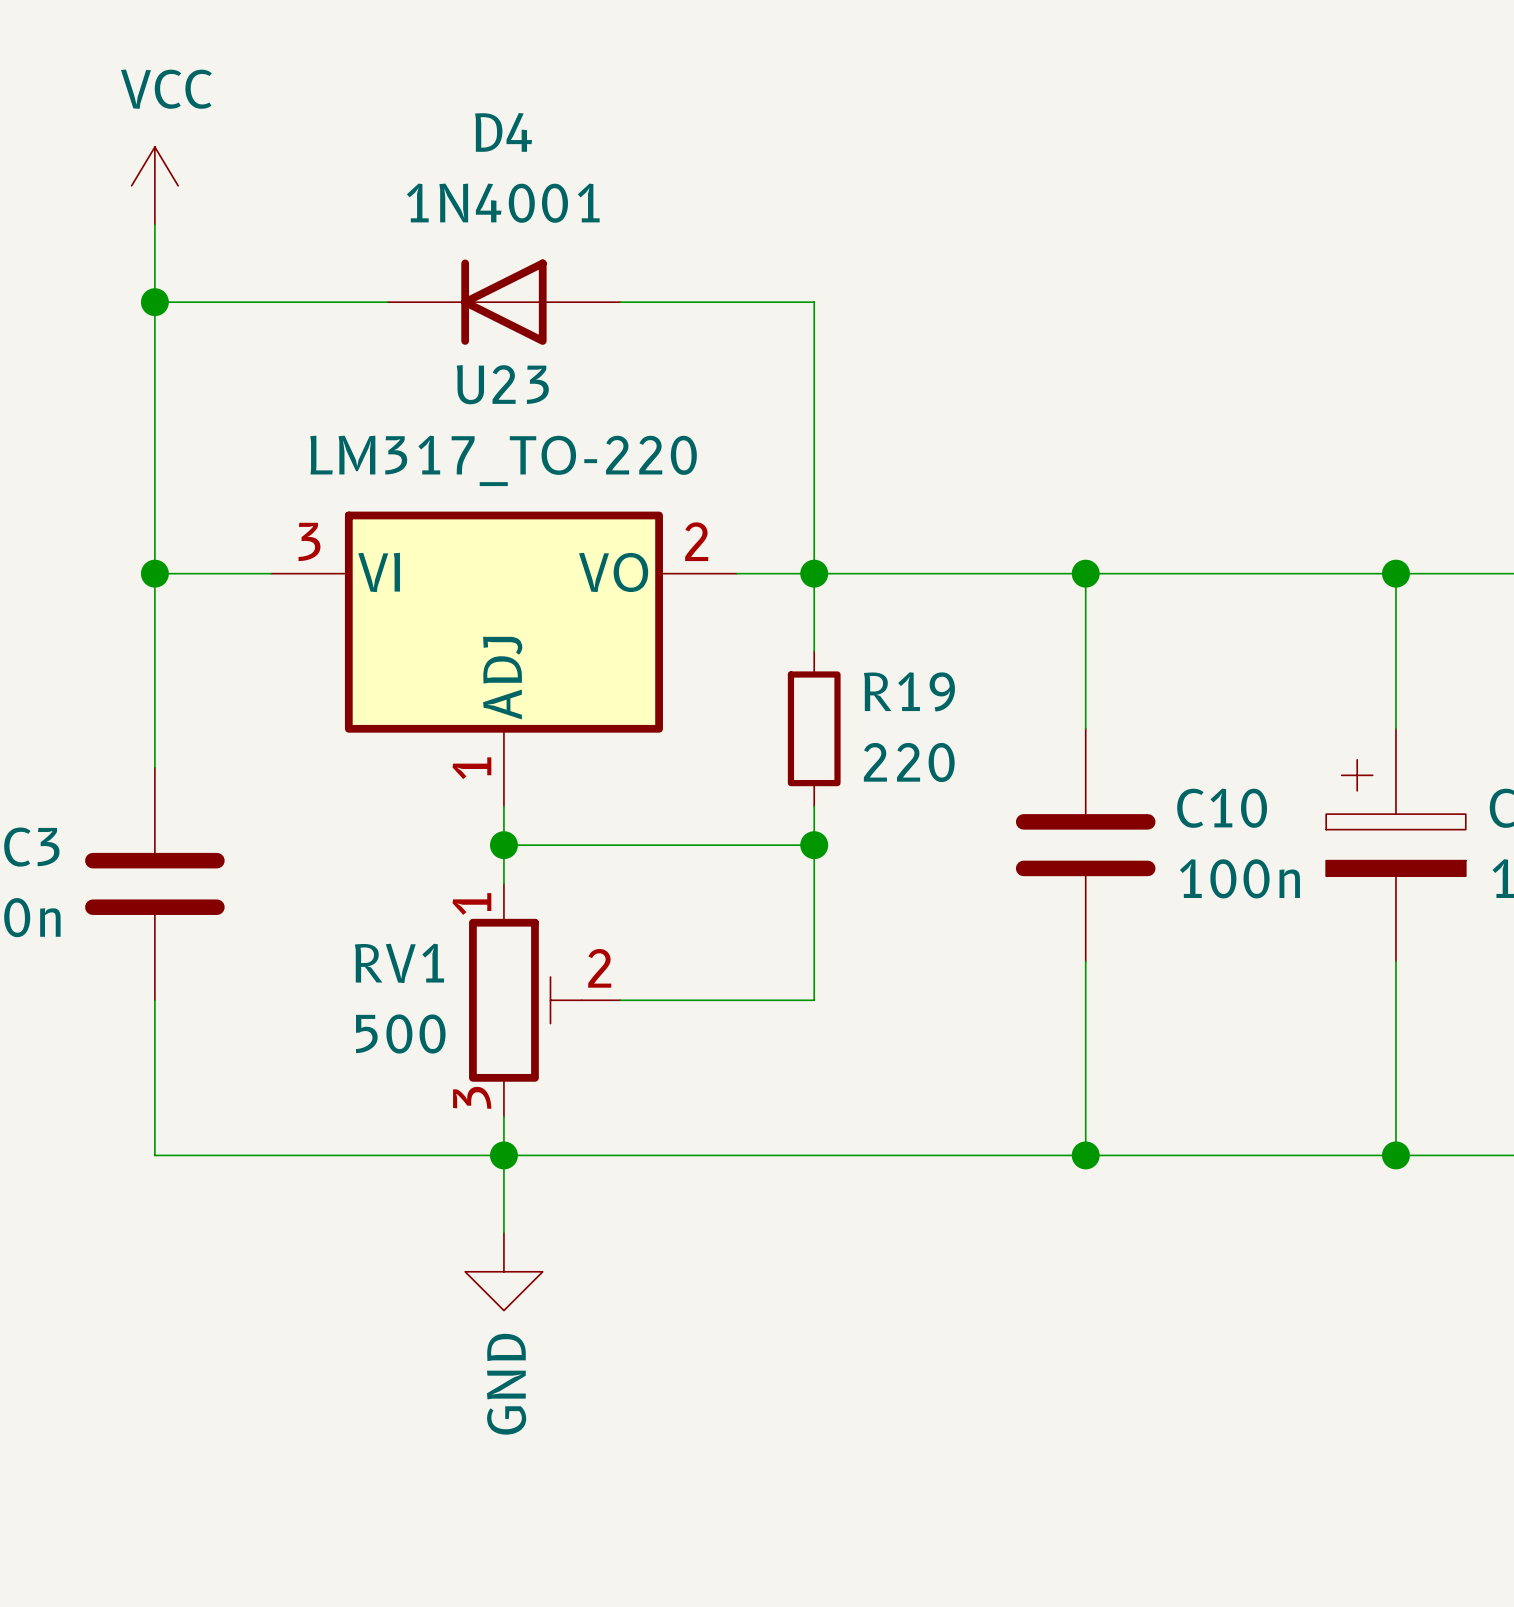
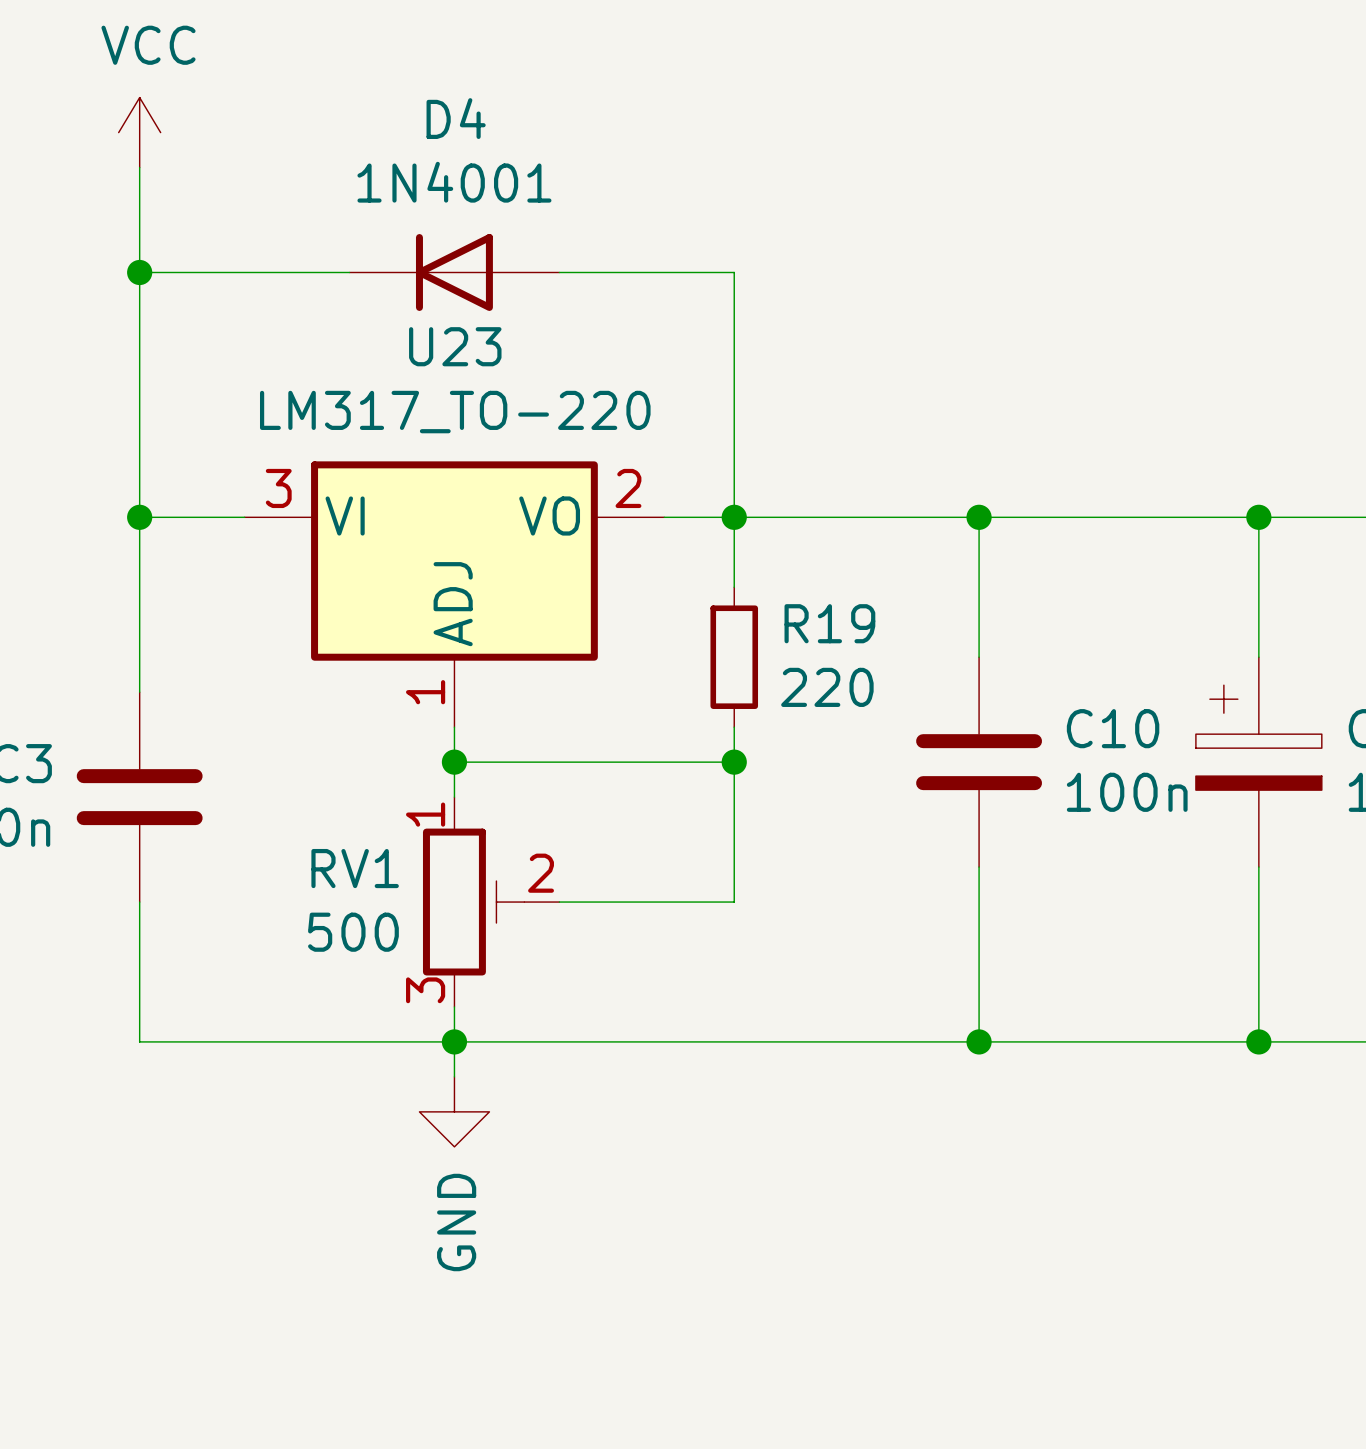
power symbol position: VCC (154, 185) -> VCC (139, 132)
power symbol position: GND (503, 1271) -> GND (454, 1111)

